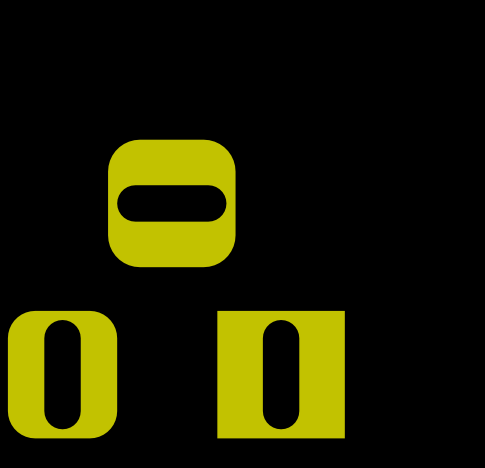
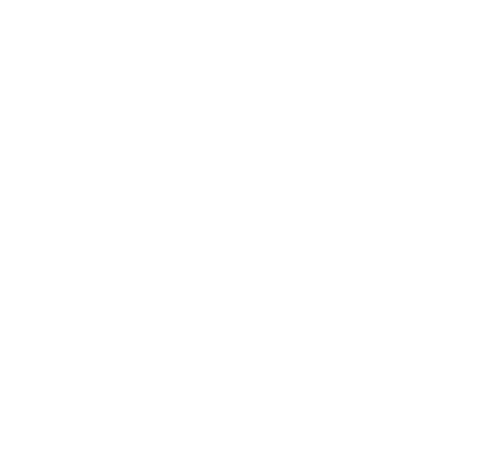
part: (176, 289) -> none

